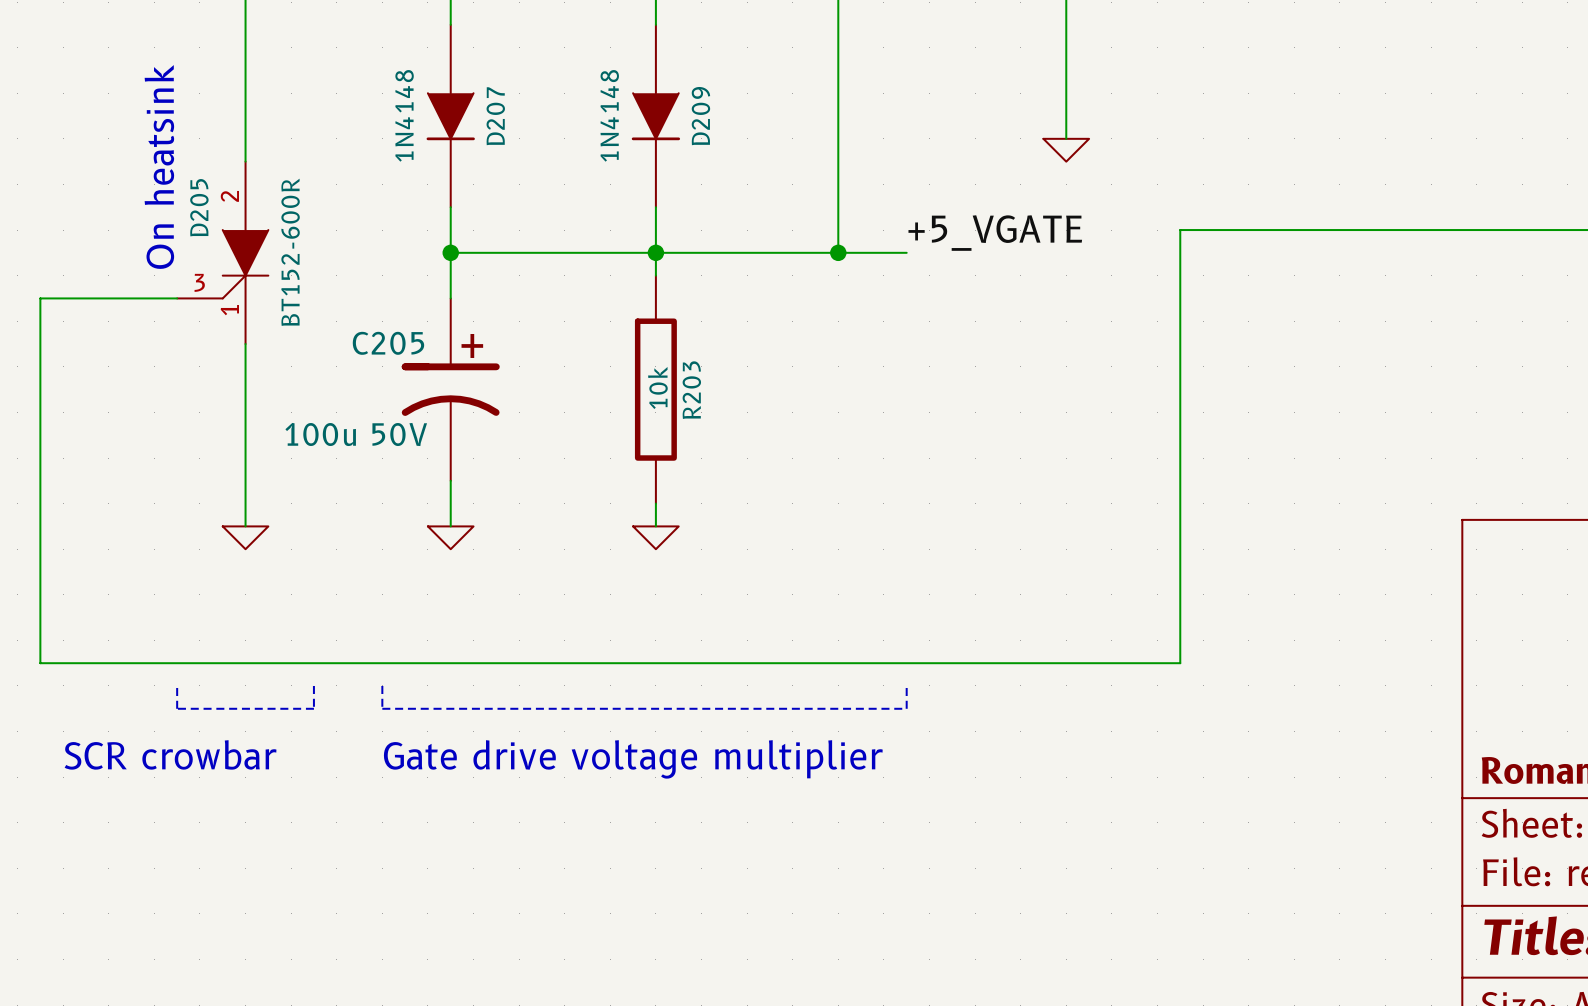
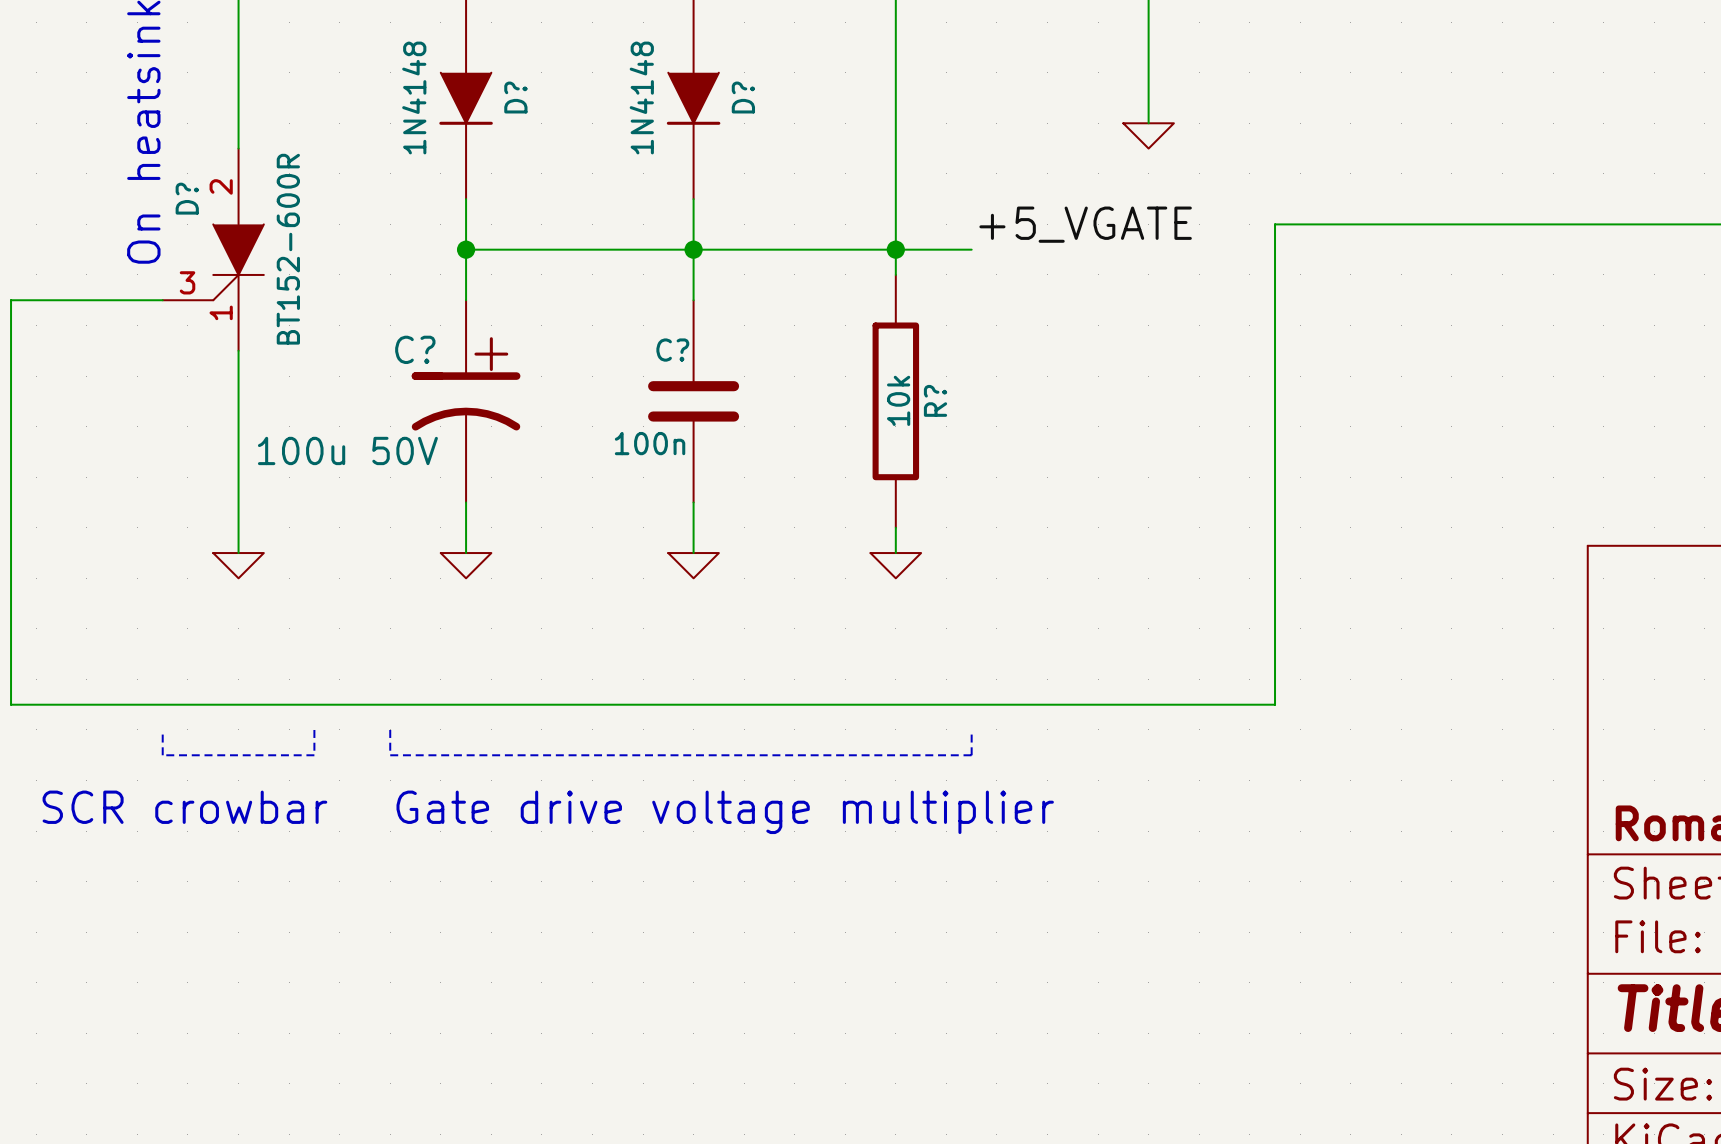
D207 name: D207 (495, 116) -> D? (515, 97)
D209 name: D209 (700, 116) -> D? (743, 97)
D205 name: D205 (199, 207) -> D? (187, 198)
wire: none -> (895, 249) (895, 274)
C205 name: C205 (388, 343) -> C? (415, 349)
R203: 10k (655, 389) -> none
C?: none -> 100n (693, 401)
R?: none -> 10k (895, 401)
wire: none -> (895, 527) (895, 553)
power symbol: none -> (895, 565)

